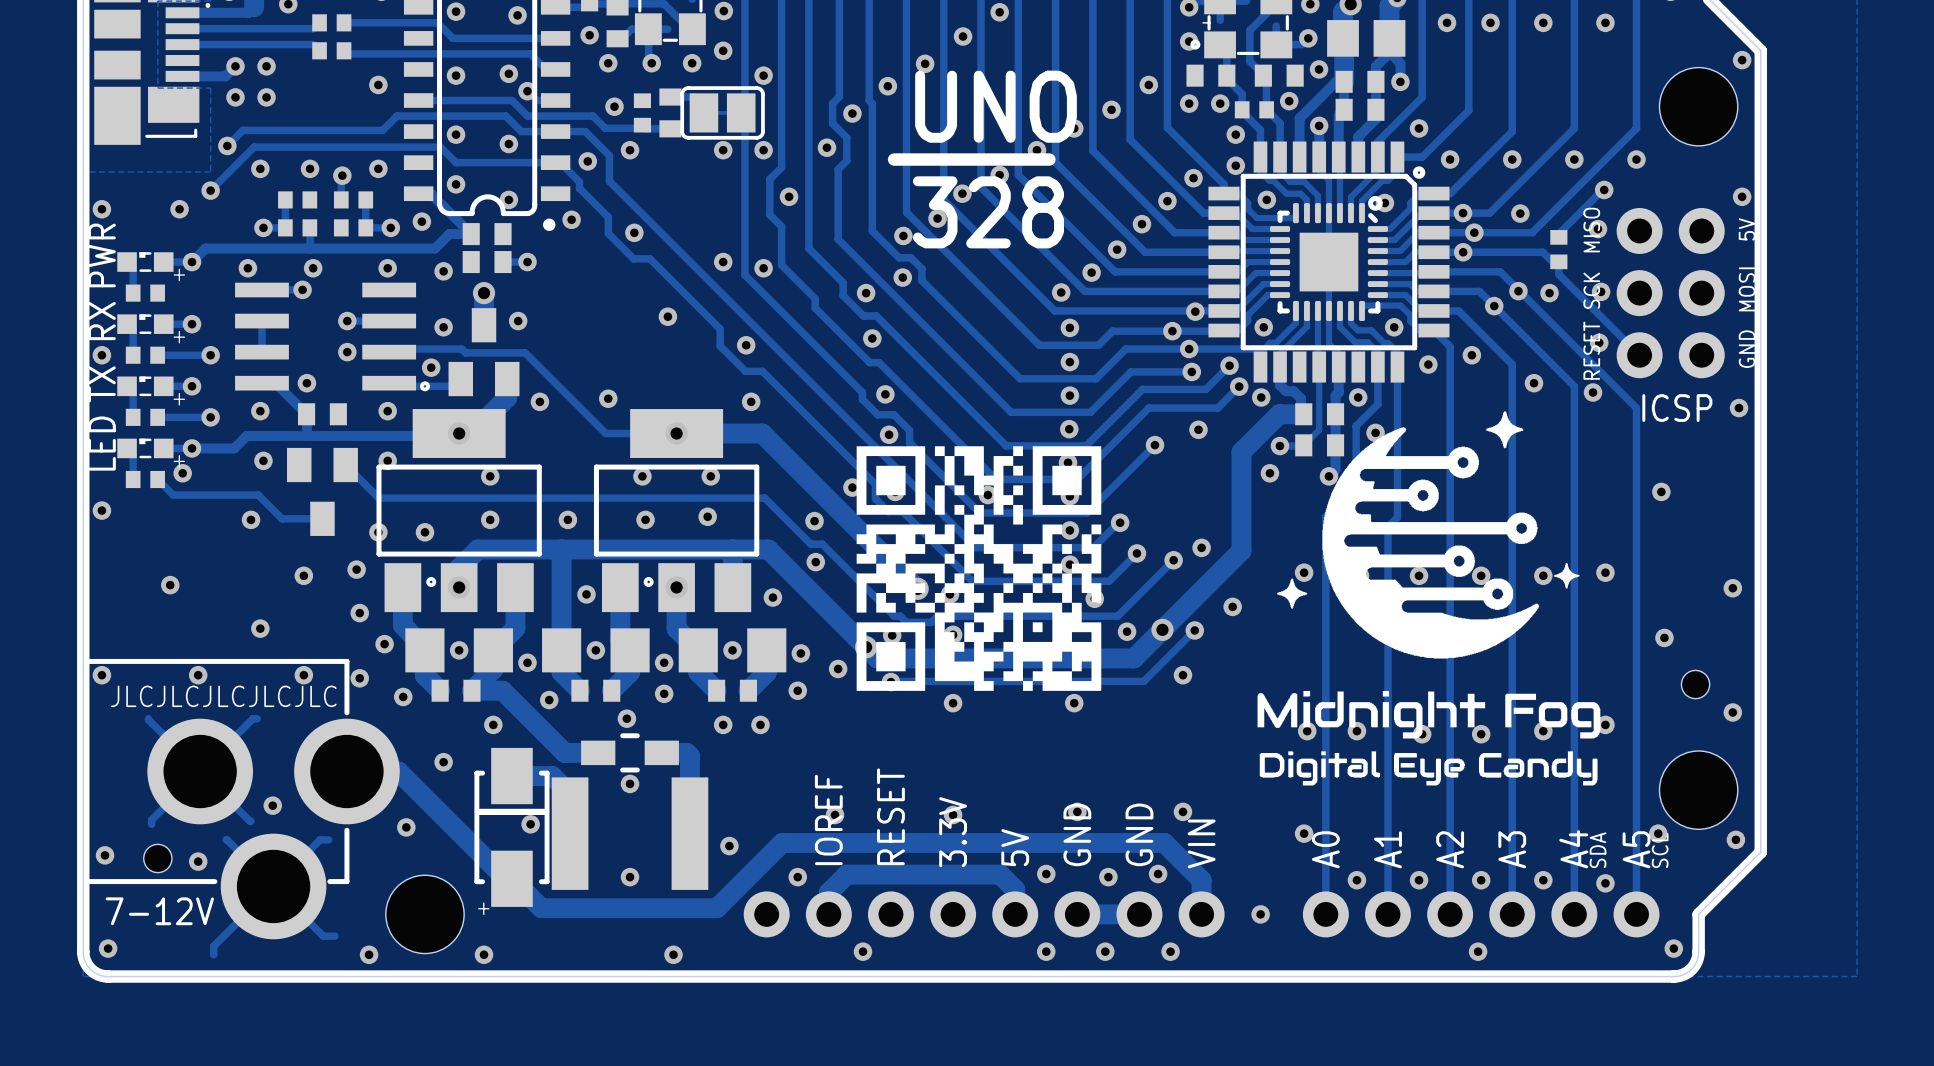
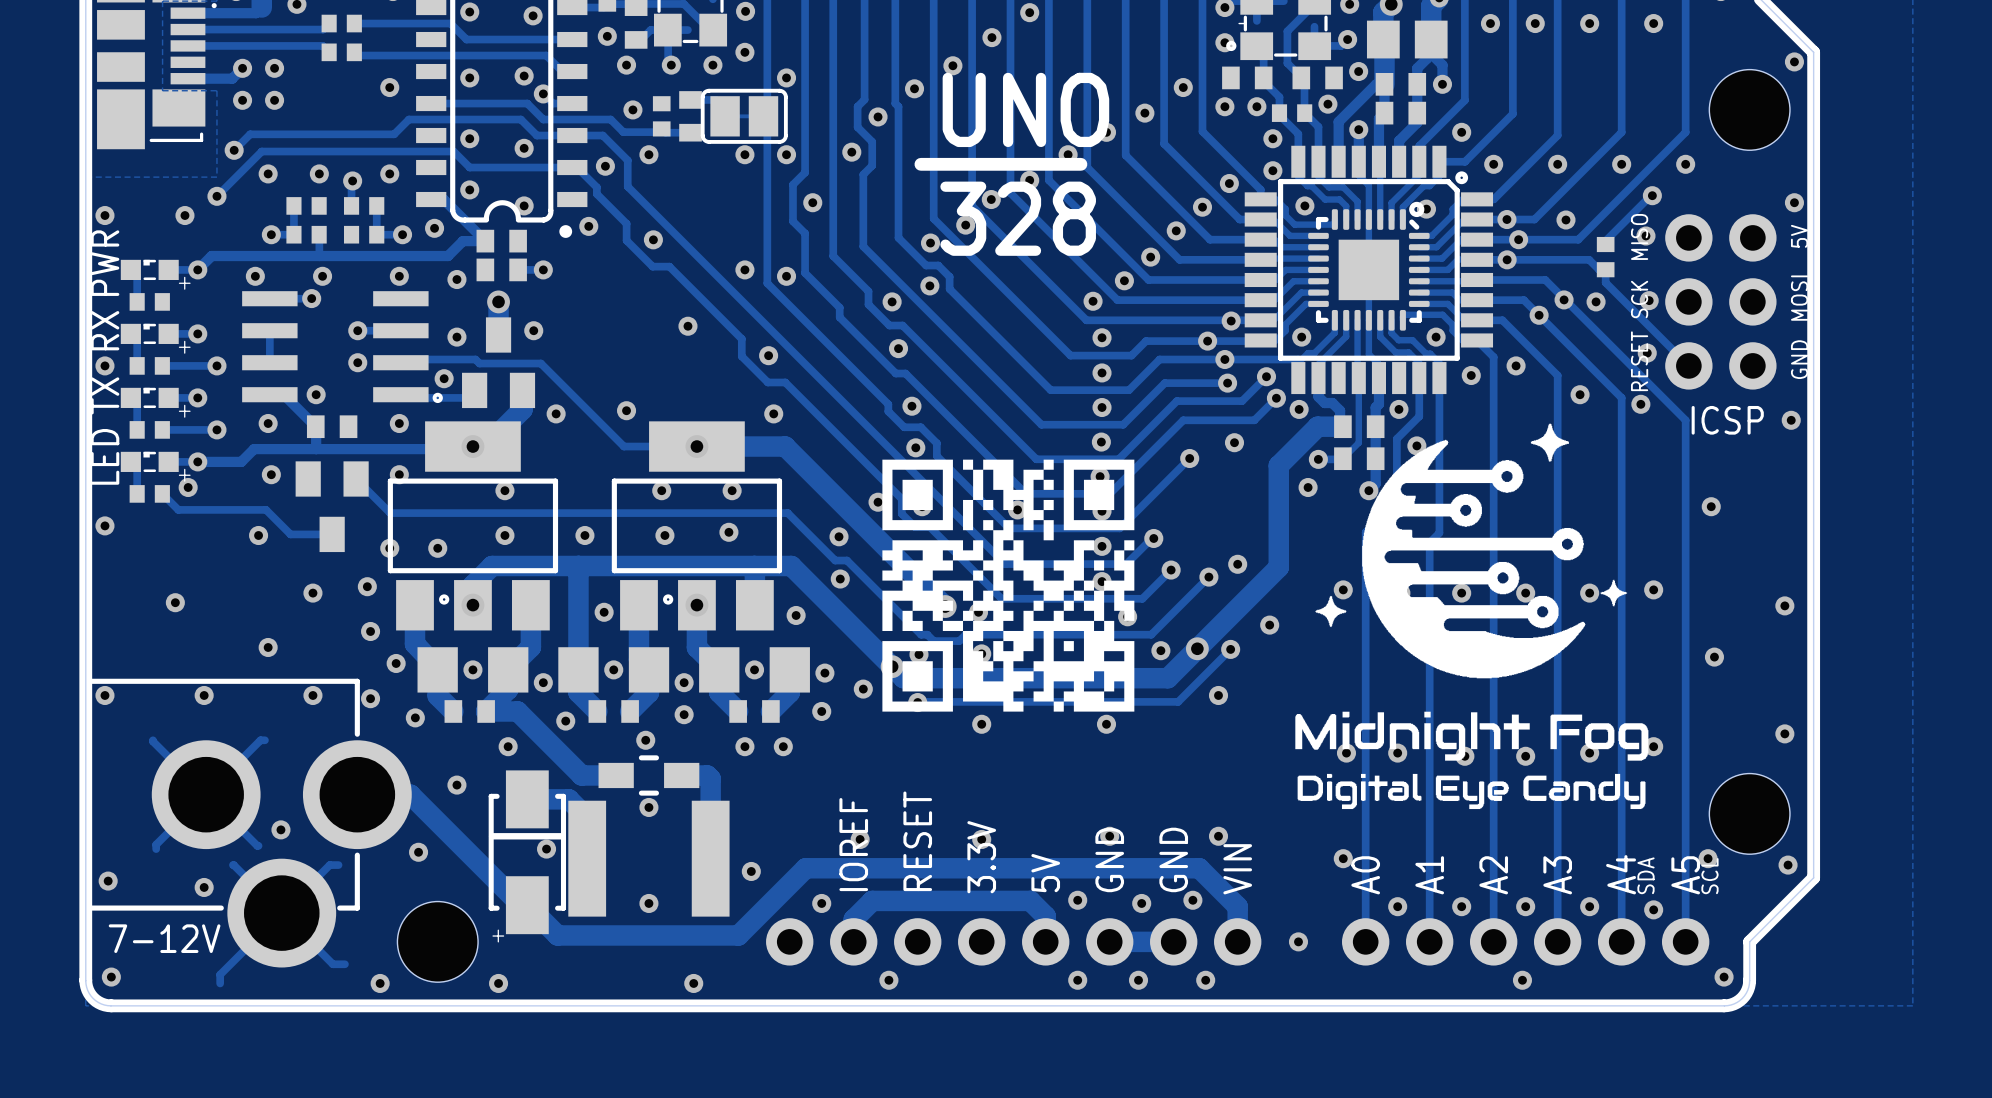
part: (1695, 684) -> none
text: JLCJLCJLCJLCJLC (223, 696) -> none
part: (157, 858) -> none

